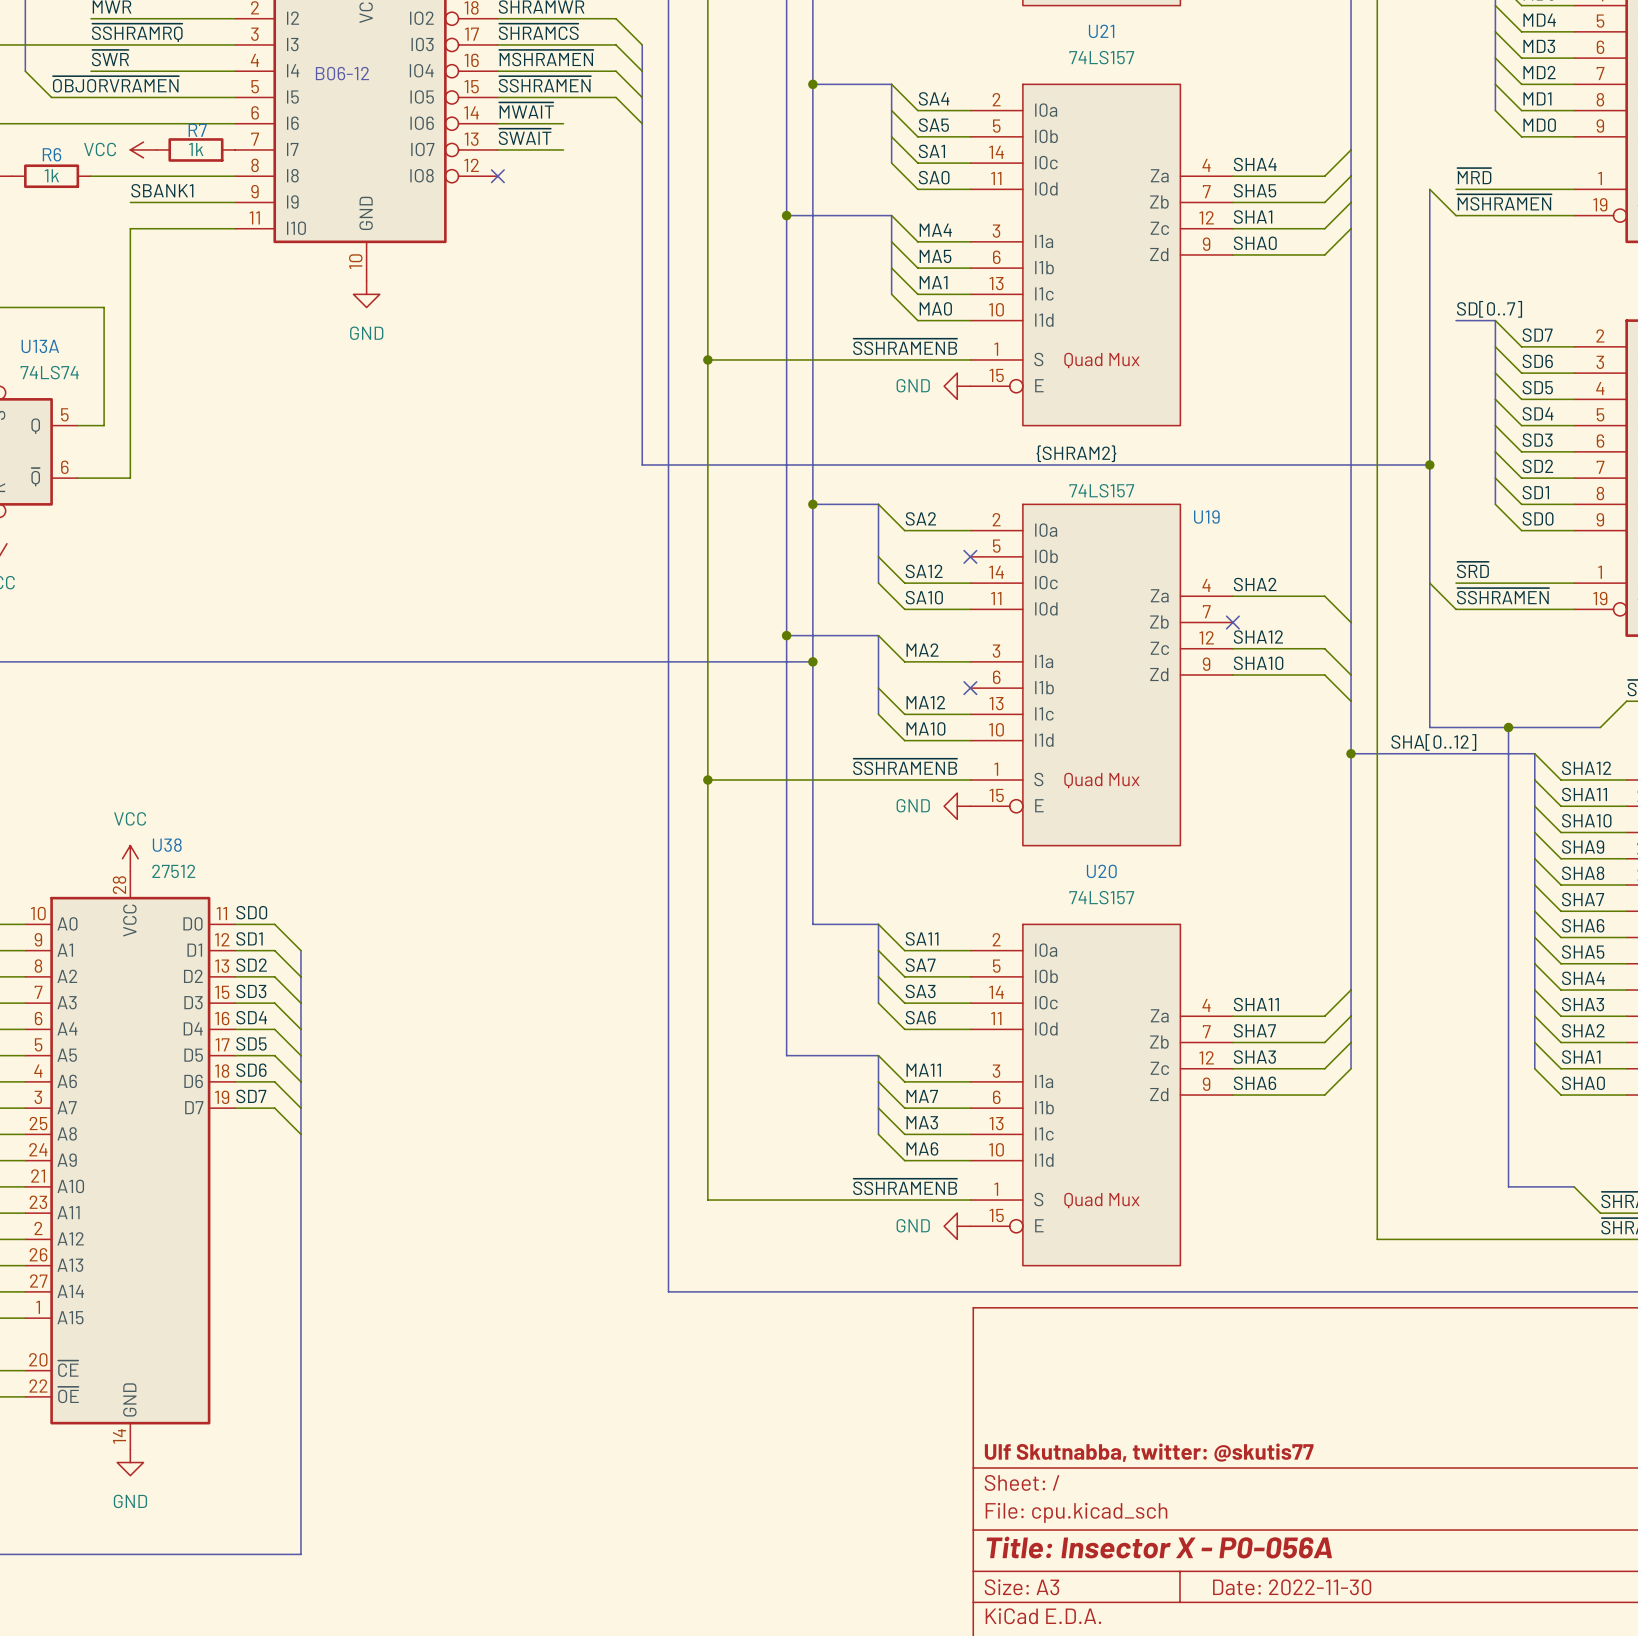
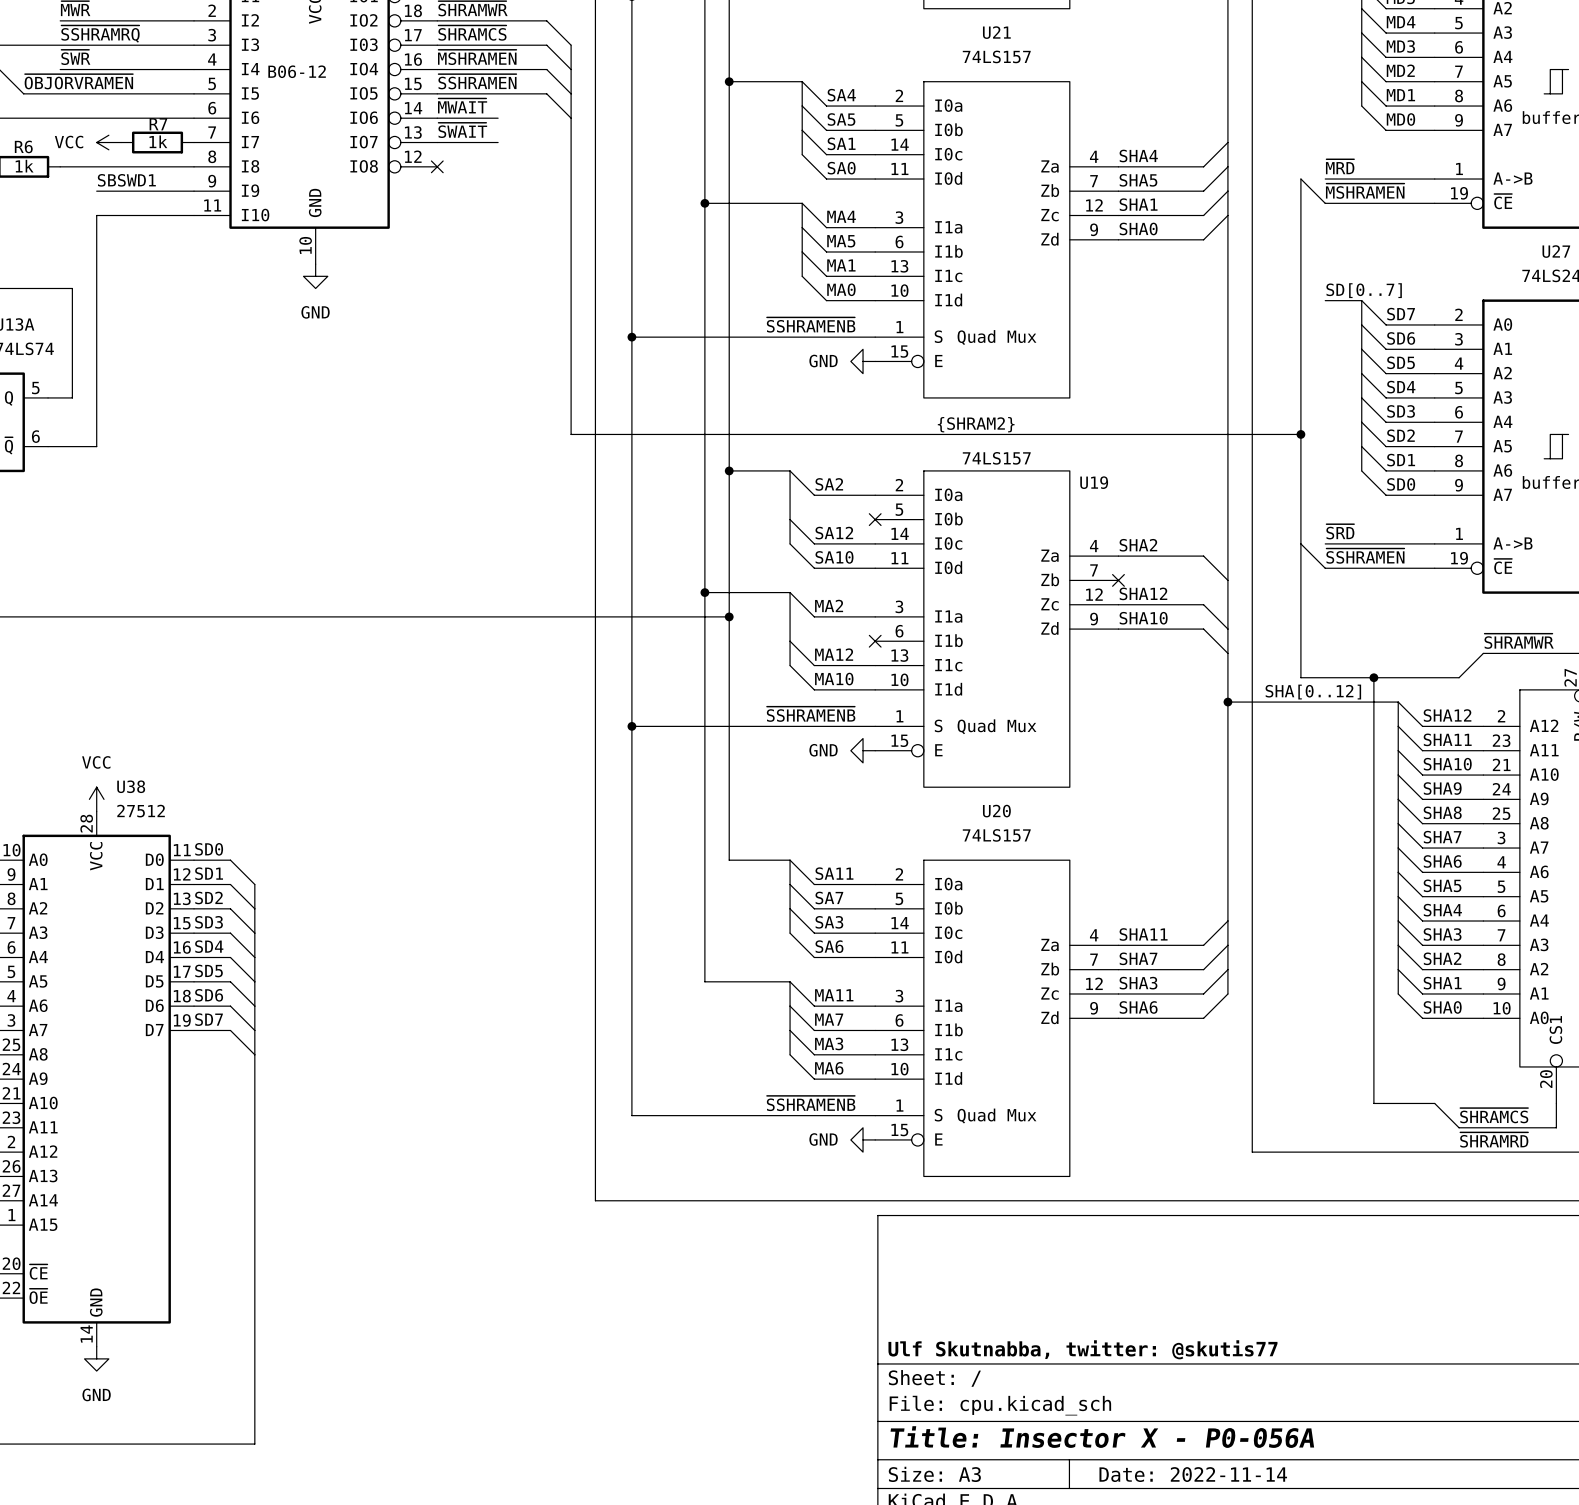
label: SBANK1 (162, 190) -> SBSWD1 (126, 180)
title block: Date: 2022-11-30 (1292, 1587) -> Date: 2022-11-14 (1193, 1474)

